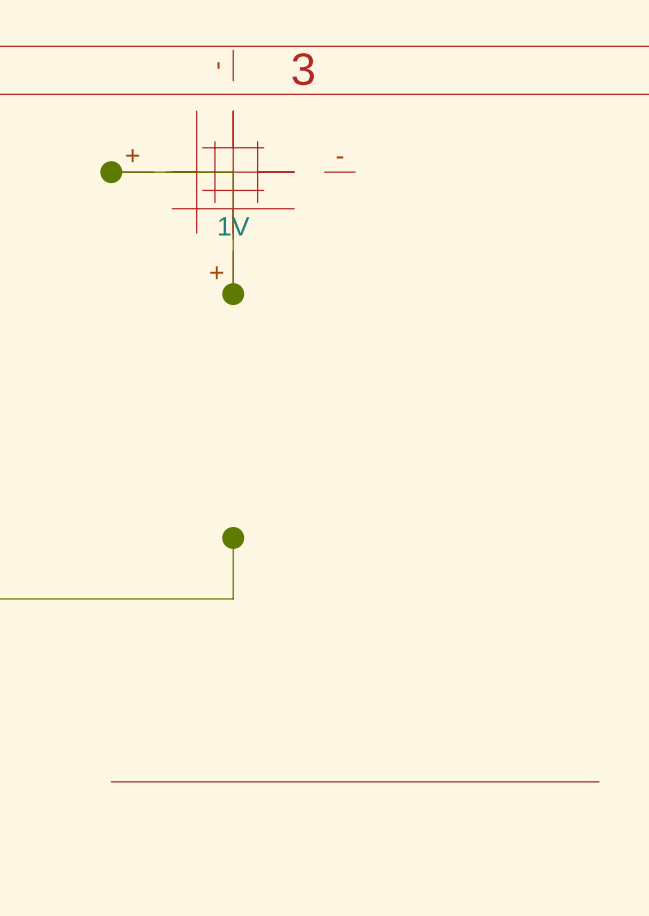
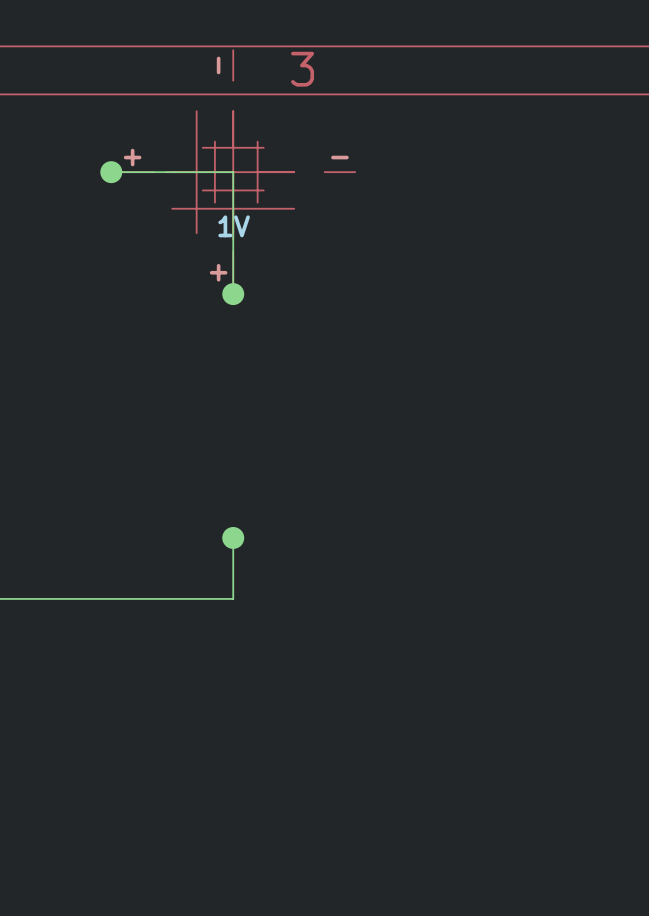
part: (355, 781) -> none

